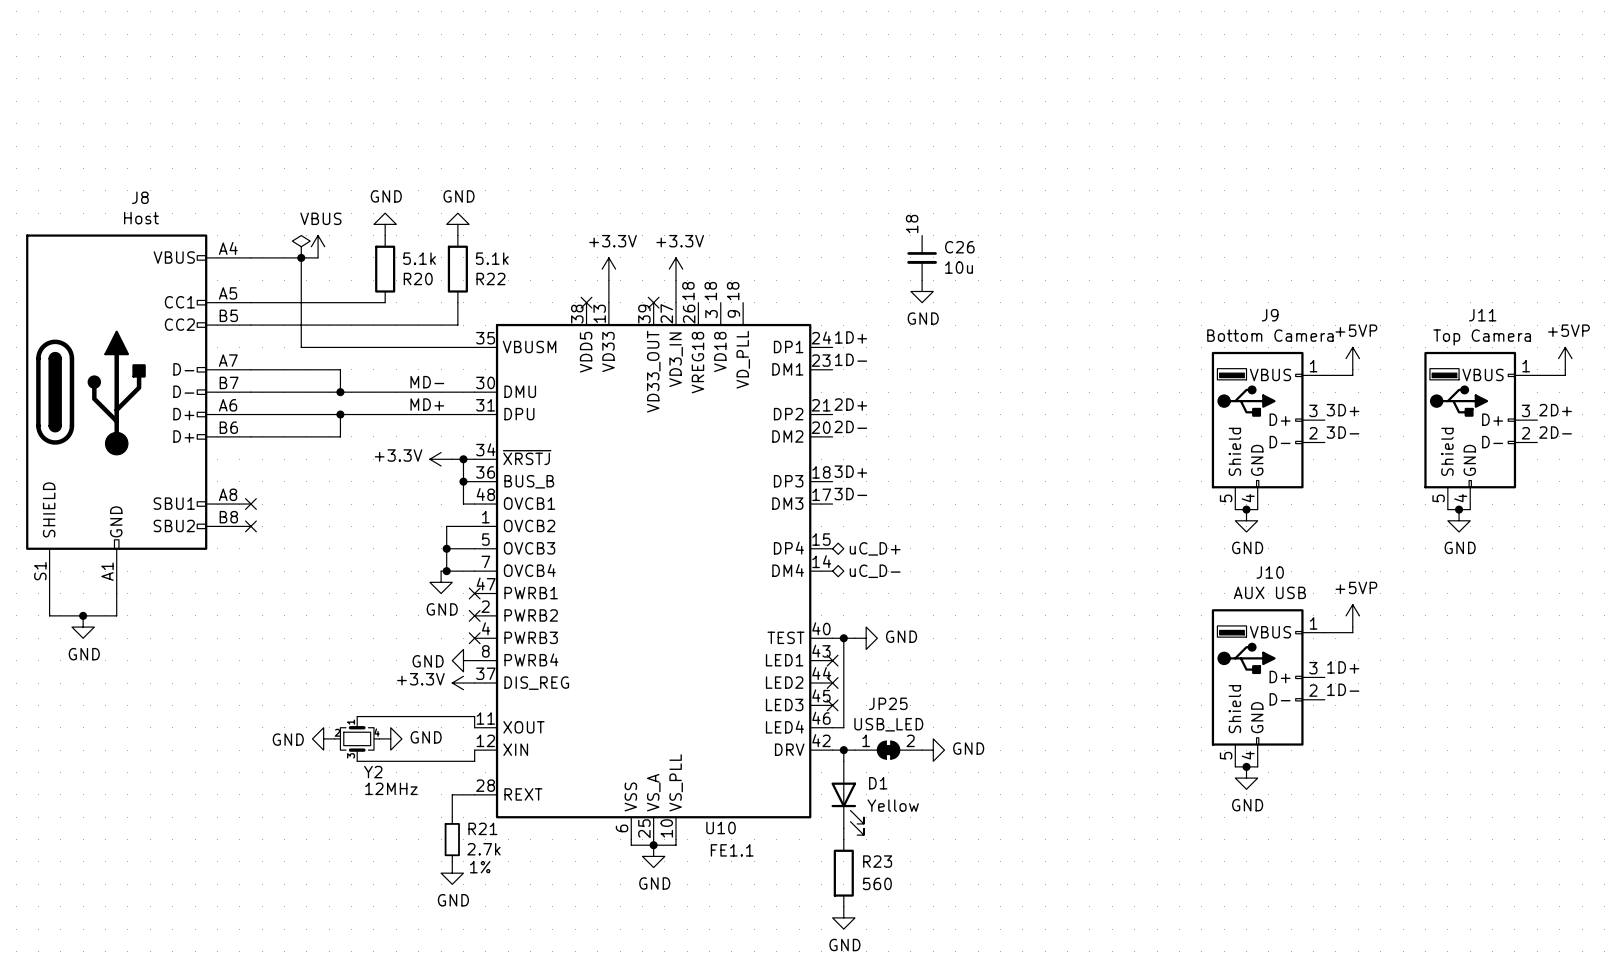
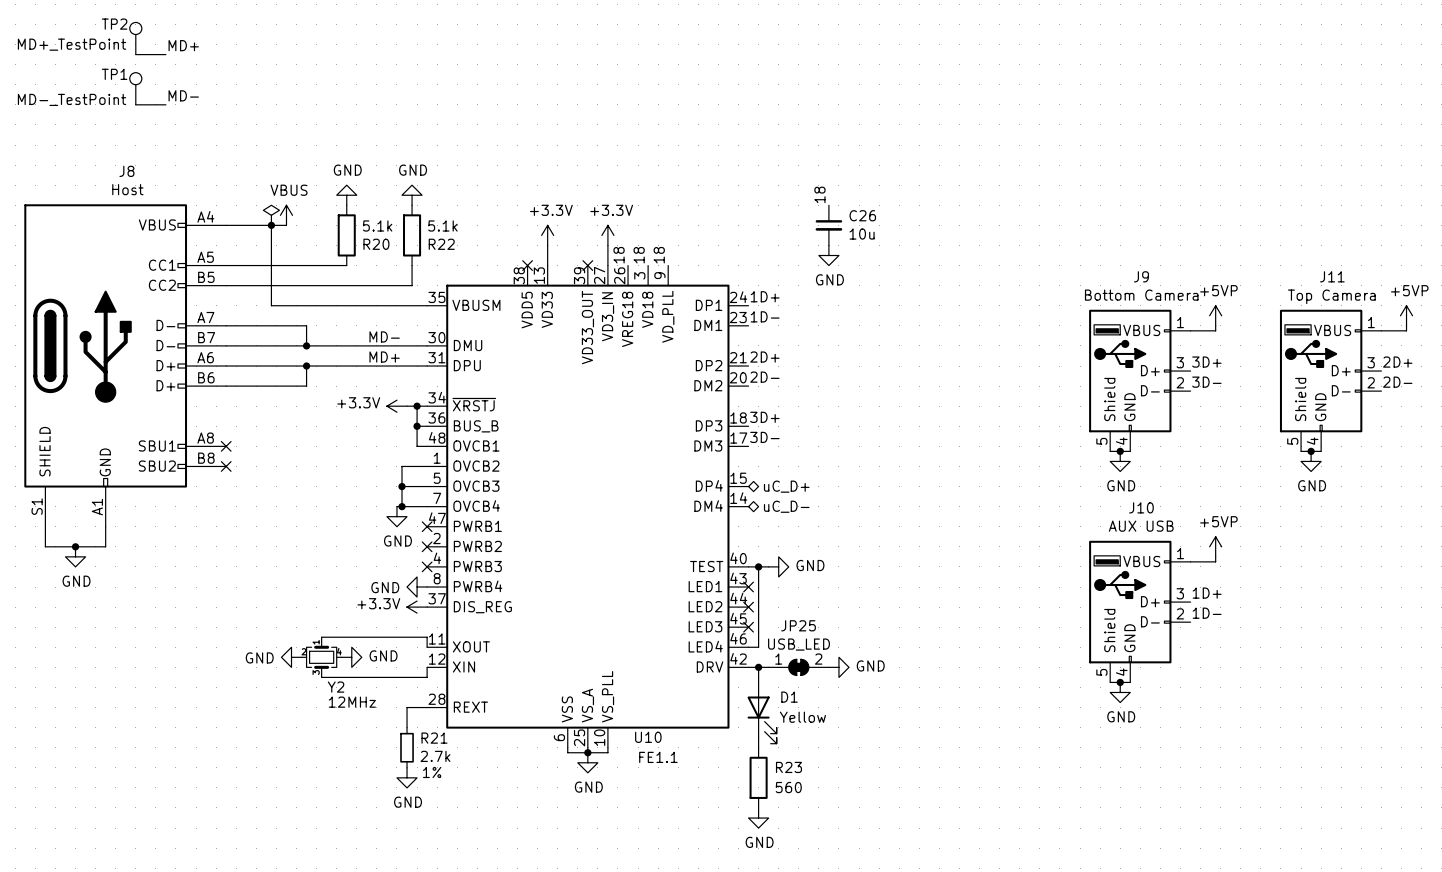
TP2: none -> MD+_TestPoint (135, 38)
label: none -> MD+ (183, 45)
wire: none -> (135, 54) (165, 54)
TP1: none -> MD-_TestPoint (135, 88)
label: none -> MD- (183, 95)
wire: none -> (135, 104) (165, 104)

